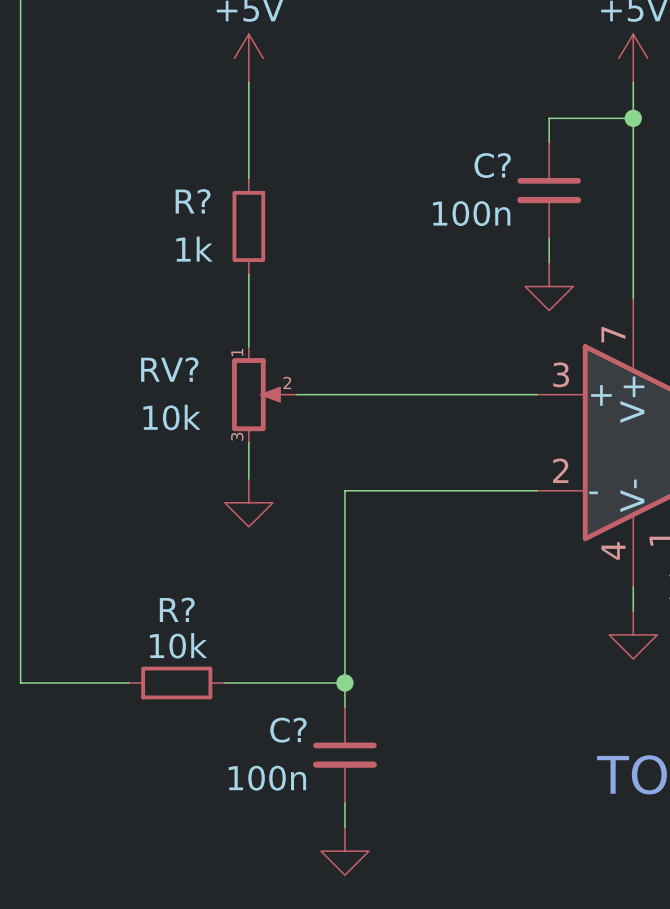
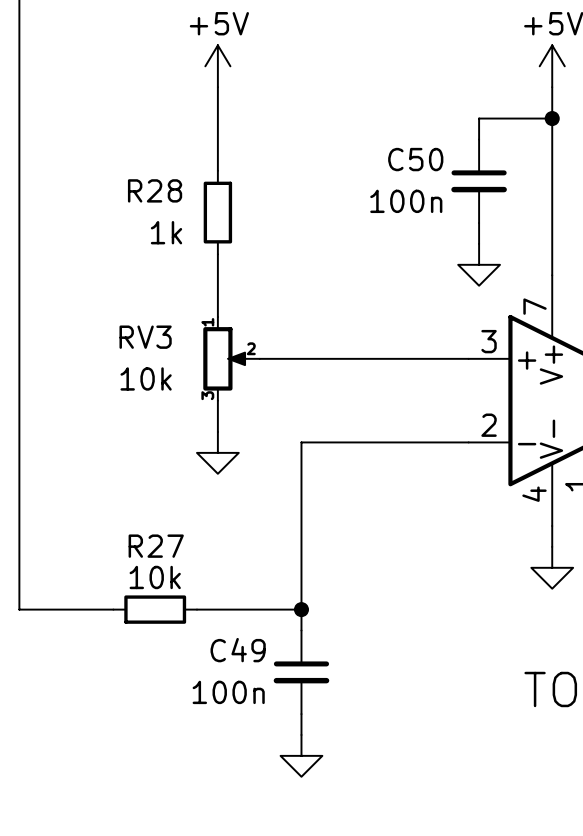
C? name: C? (492, 165) -> C50 (415, 159)
R? name: R? (193, 201) -> R28 (155, 190)
RV? name: RV? (169, 369) -> RV3 (145, 337)
R? name: R? (177, 609) -> R27 (156, 546)
C? name: C? (288, 730) -> C49 (238, 650)

